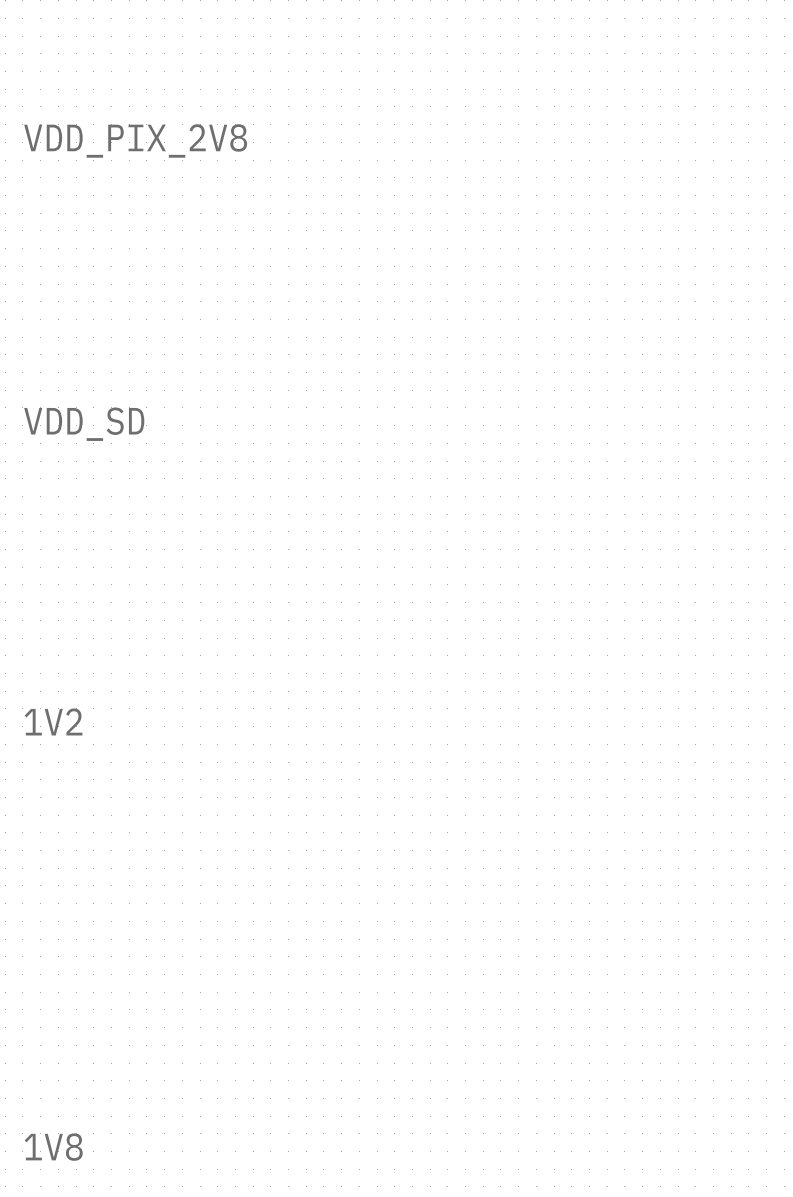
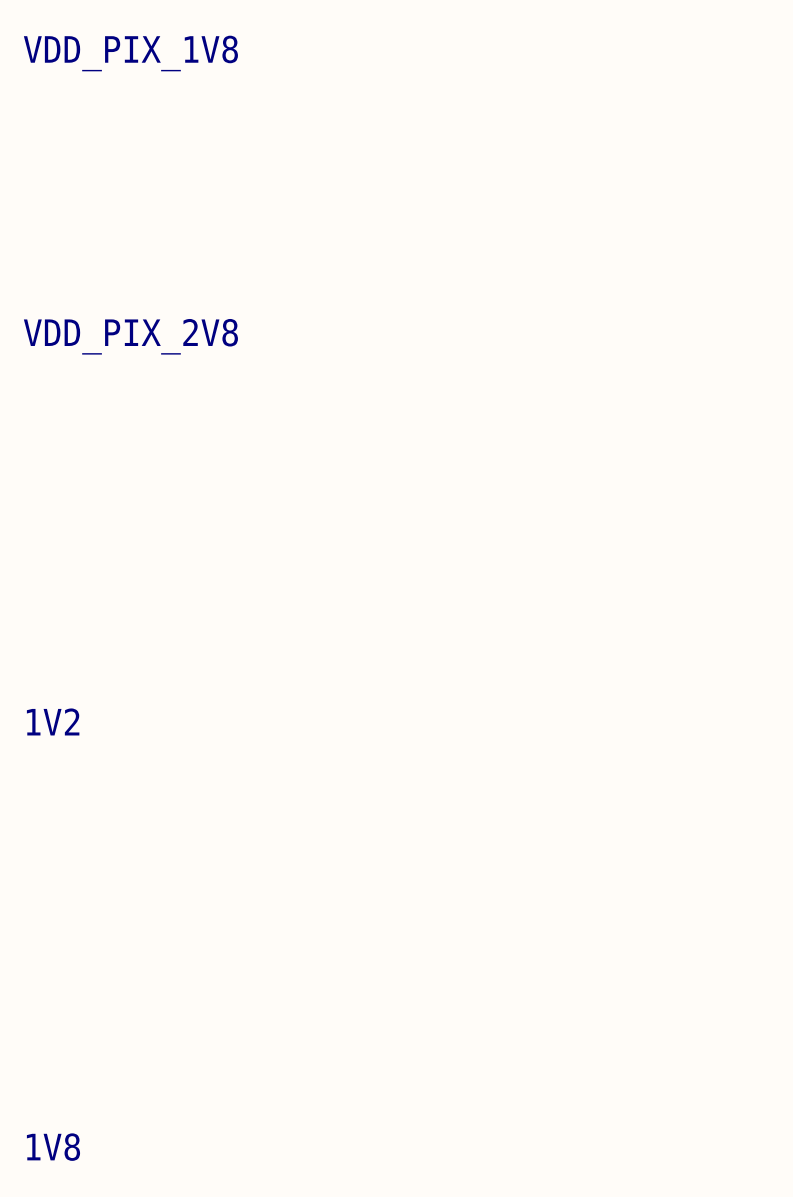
text: none -> VDD_PIX_1V8 (130, 53)
text: VDD_PIX_2V8 (135, 140) -> none
text: none -> VDD_PIX_2V8 (130, 336)
text: VDD_SD (84, 424) -> none

